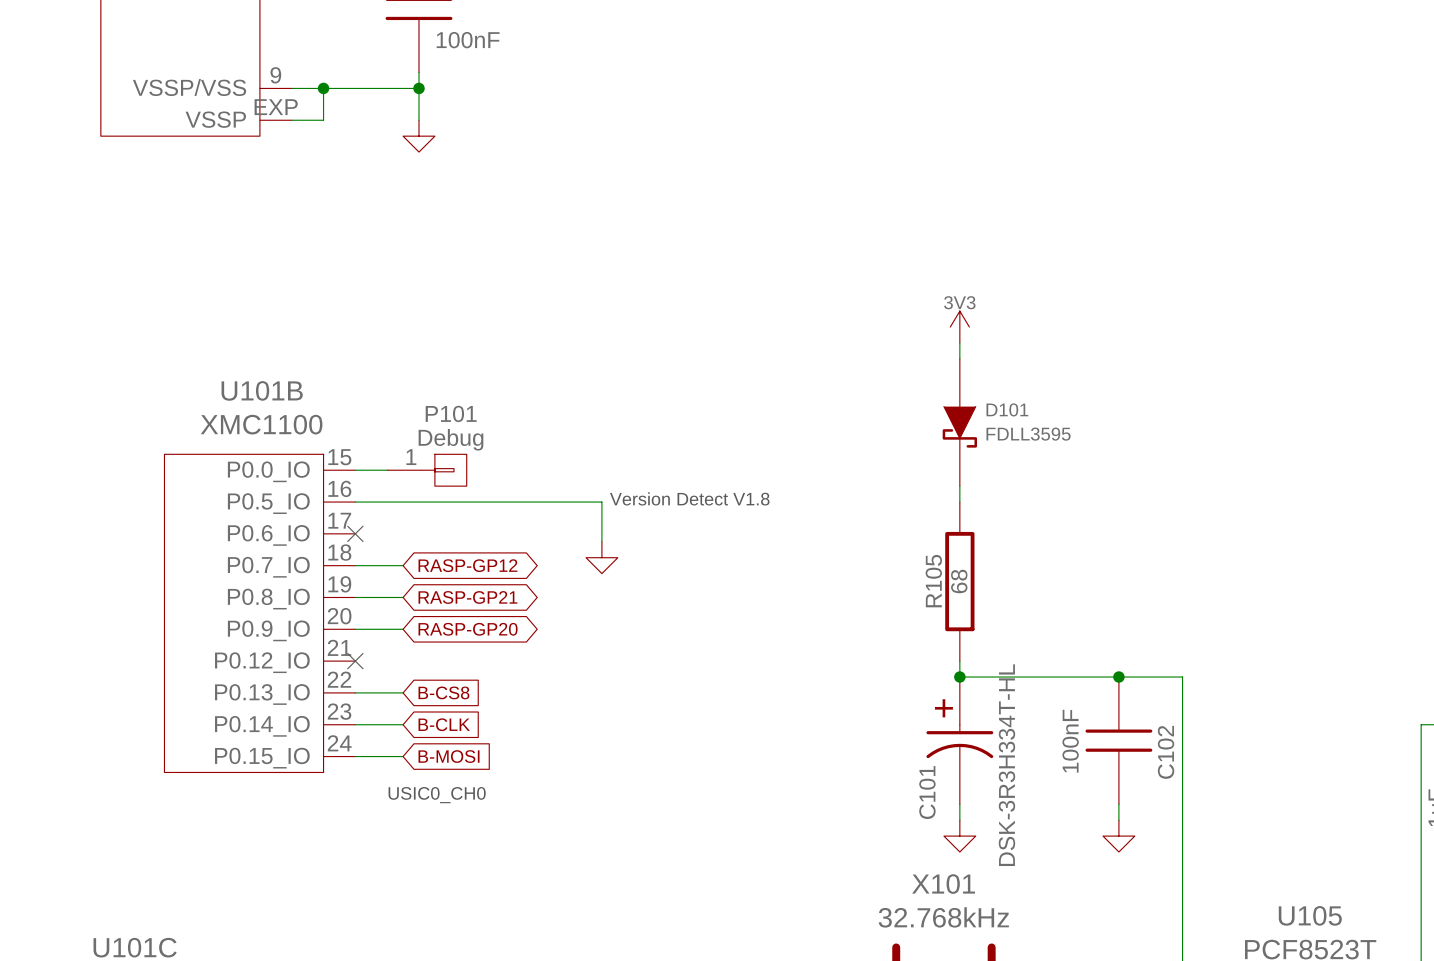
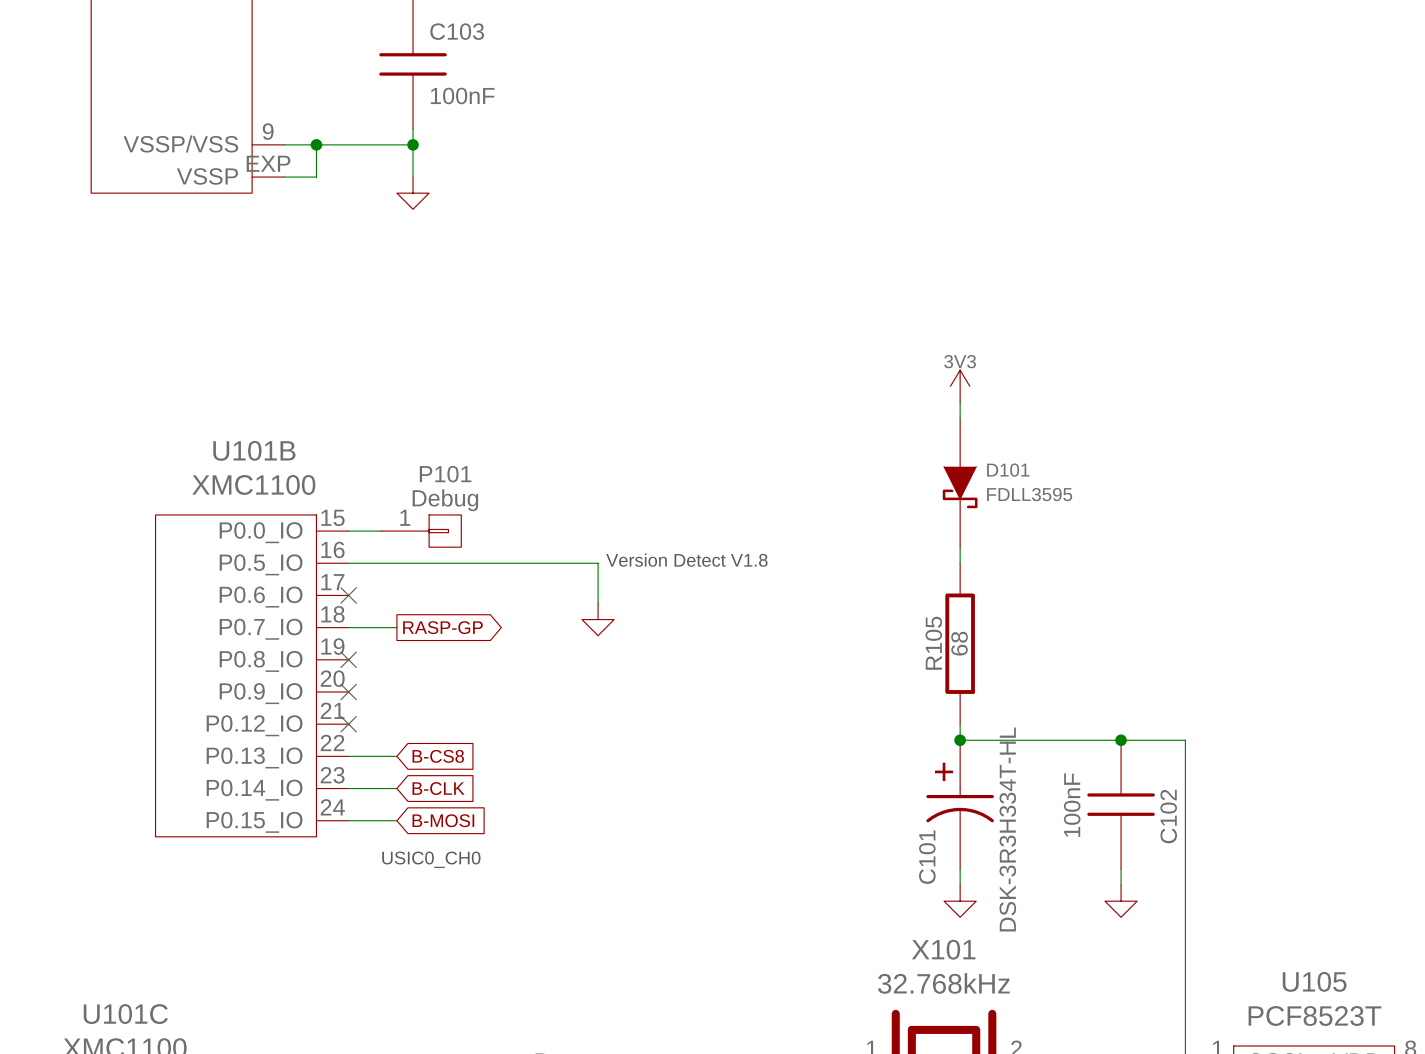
global label shape: bidirectional (467, 565) -> output (442, 627)
global label: RASP-GP12 (467, 565) -> RASP-GP (442, 627)
wire: (355, 597) (403, 597) -> none
no-connect mark: none -> (348, 659)
global label: RASP-GP21 (467, 597) -> none
wire: (355, 629) (403, 629) -> none
no-connect mark: none -> (348, 691)
global label: RASP-GP20 (468, 629) -> none

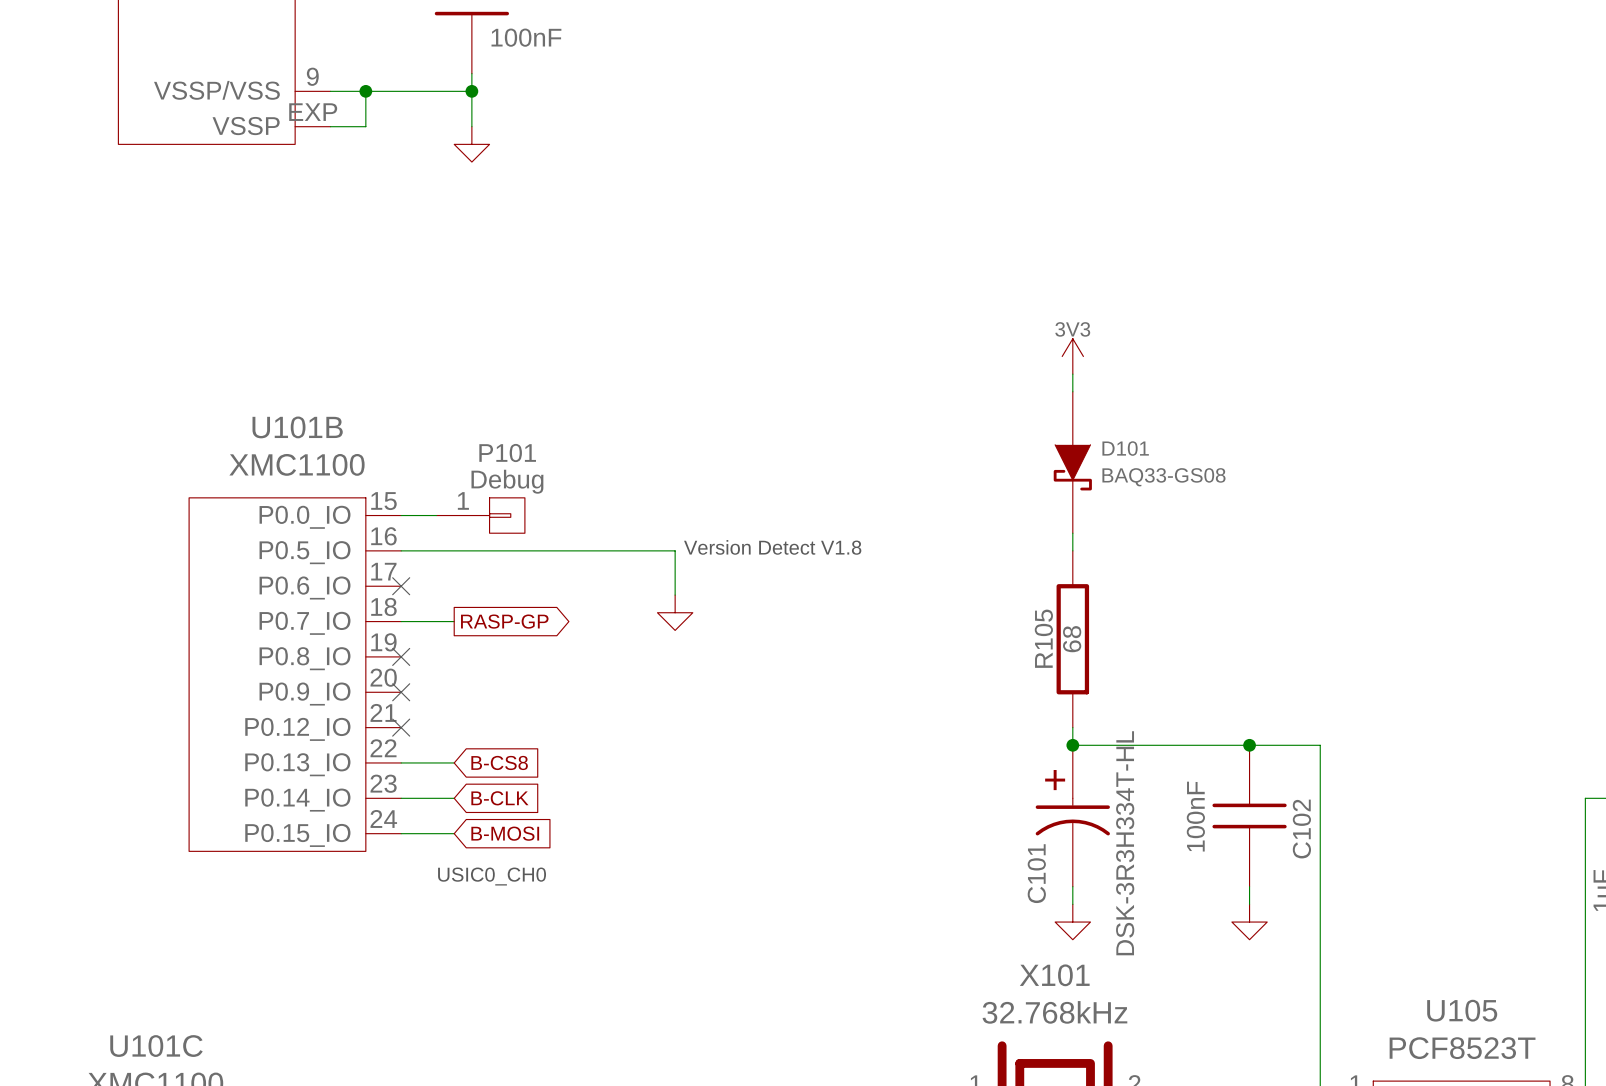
D101 value: FDLL3595 (1029, 494) -> BAQ33-GS08 (1163, 477)

